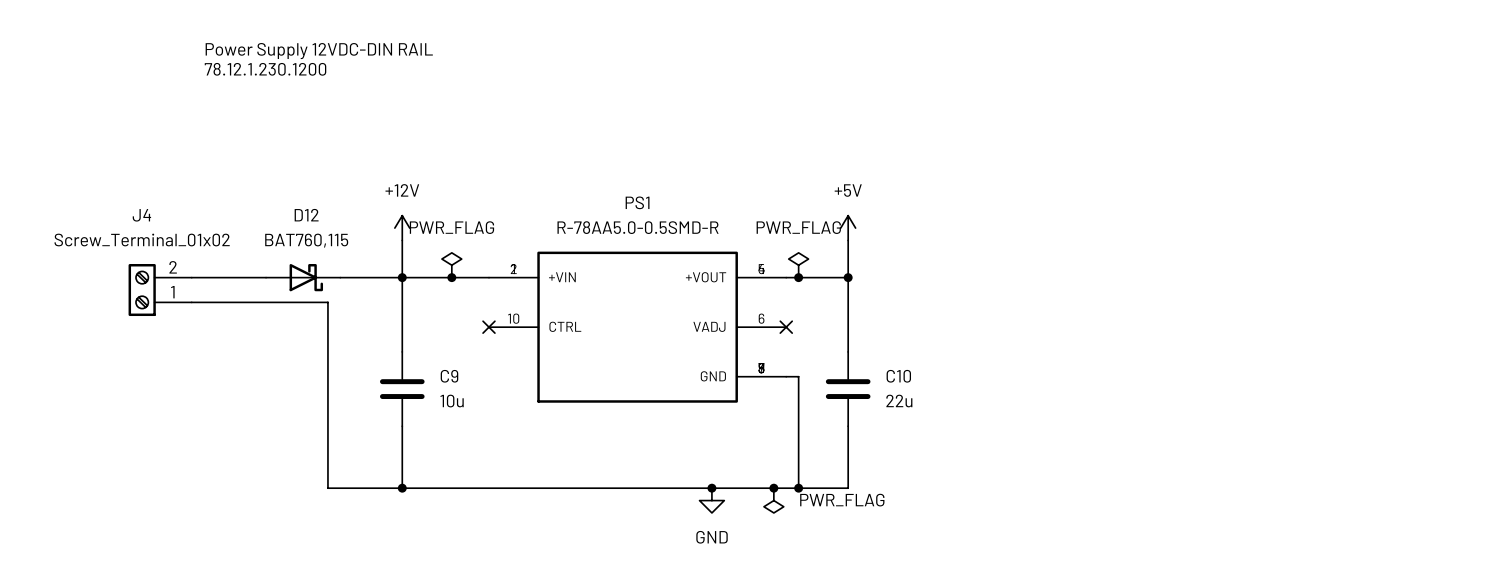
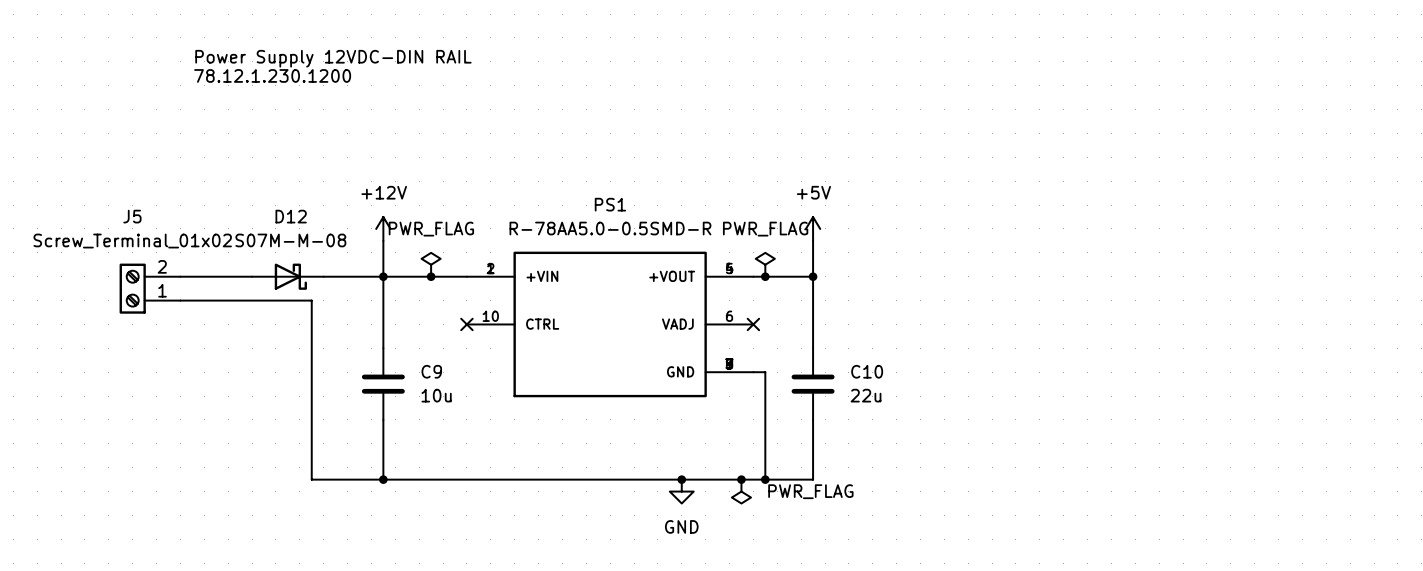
J4 name: J4 (141, 215) -> J5 (132, 216)
D12 value: BAT760,115 (306, 240) -> S07M-M-08 (290, 240)

